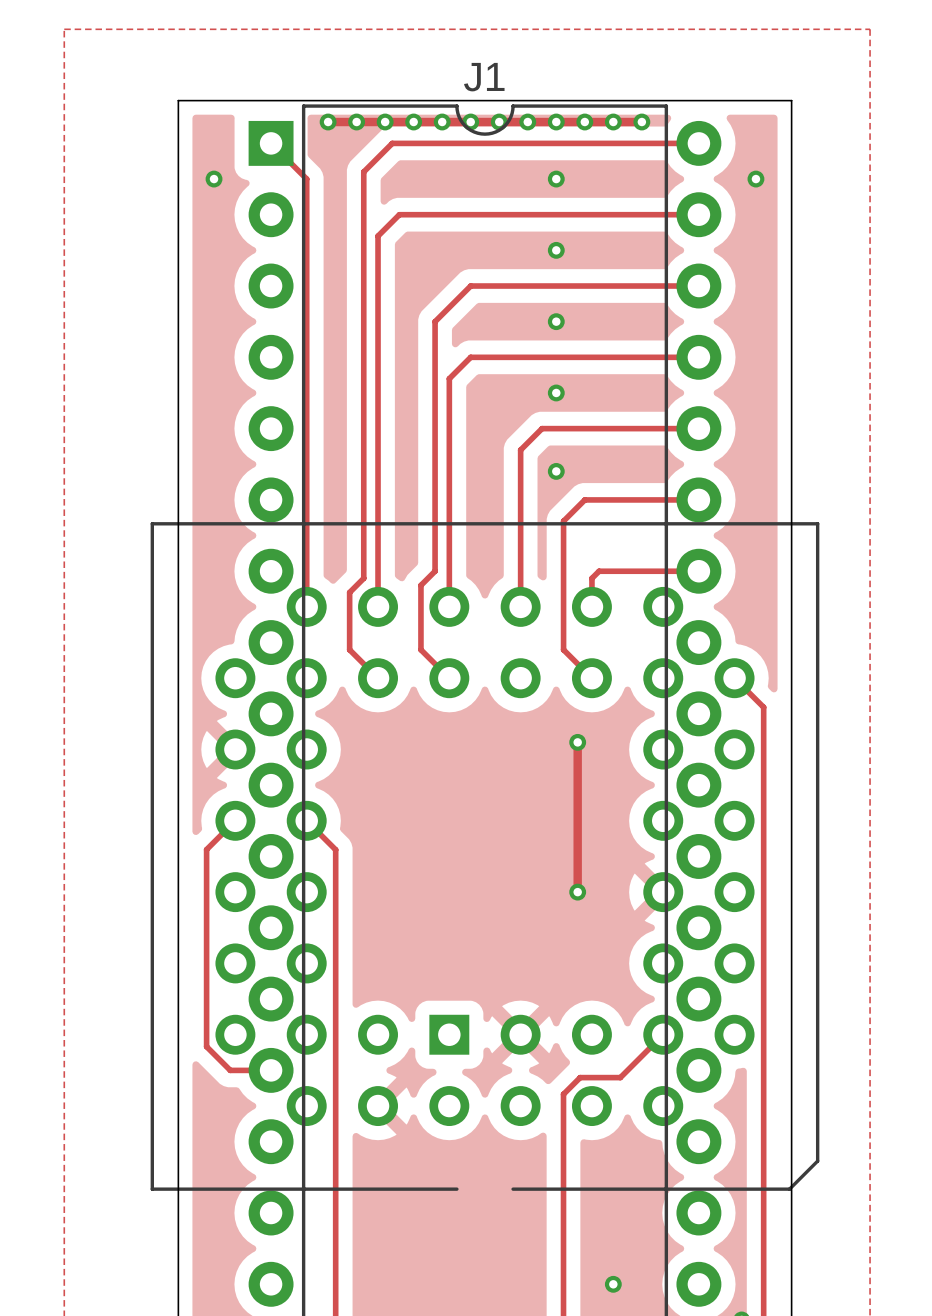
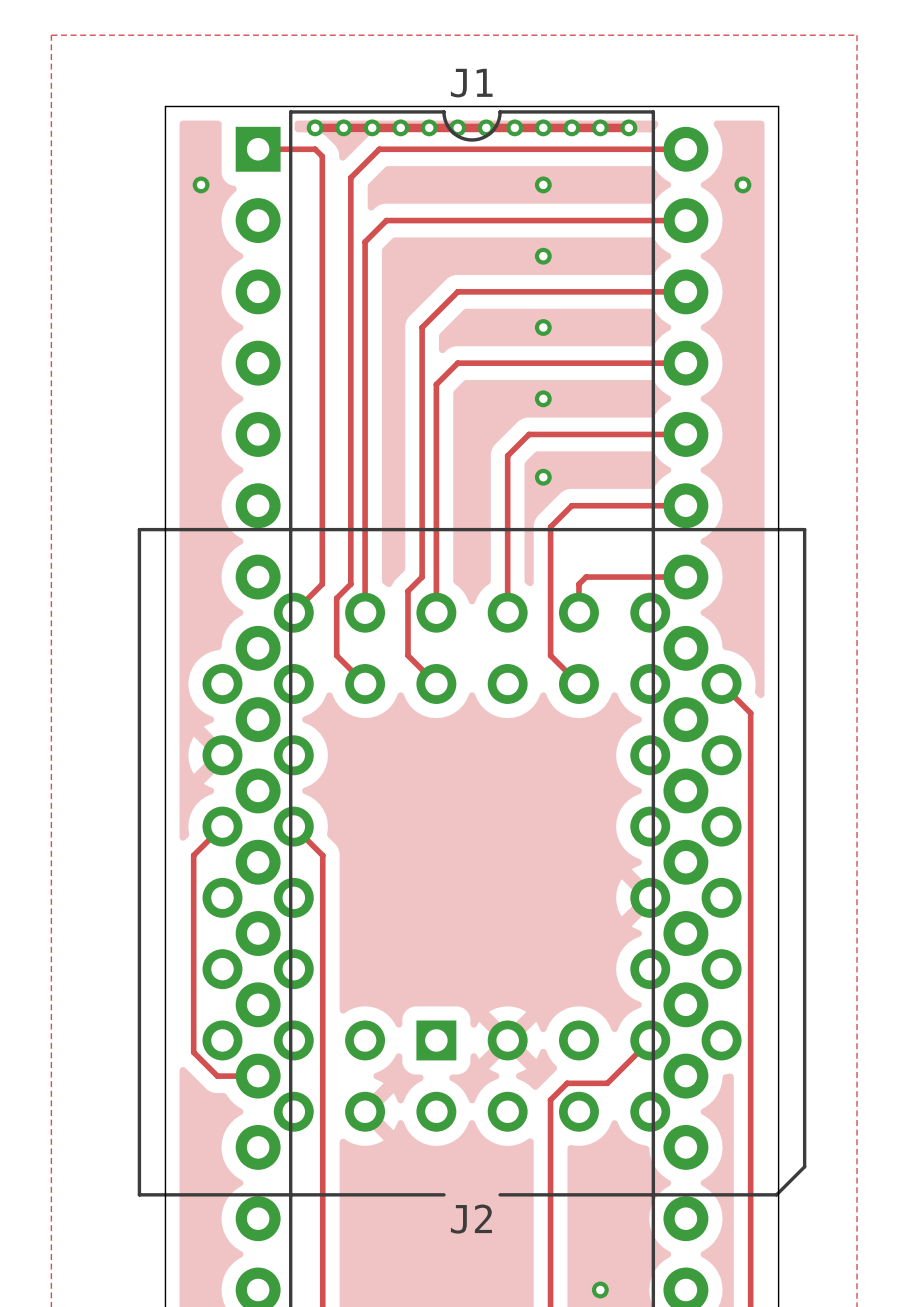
track: (271, 143) (306, 179) (306, 606) -> (258, 149) (315, 149) (322, 156) (322, 584) (293, 612)
track: (577, 742) (577, 892) -> none
via: (577, 742) -> none
via: (577, 892) -> none
J2 name: none -> J2 (471, 1219)

